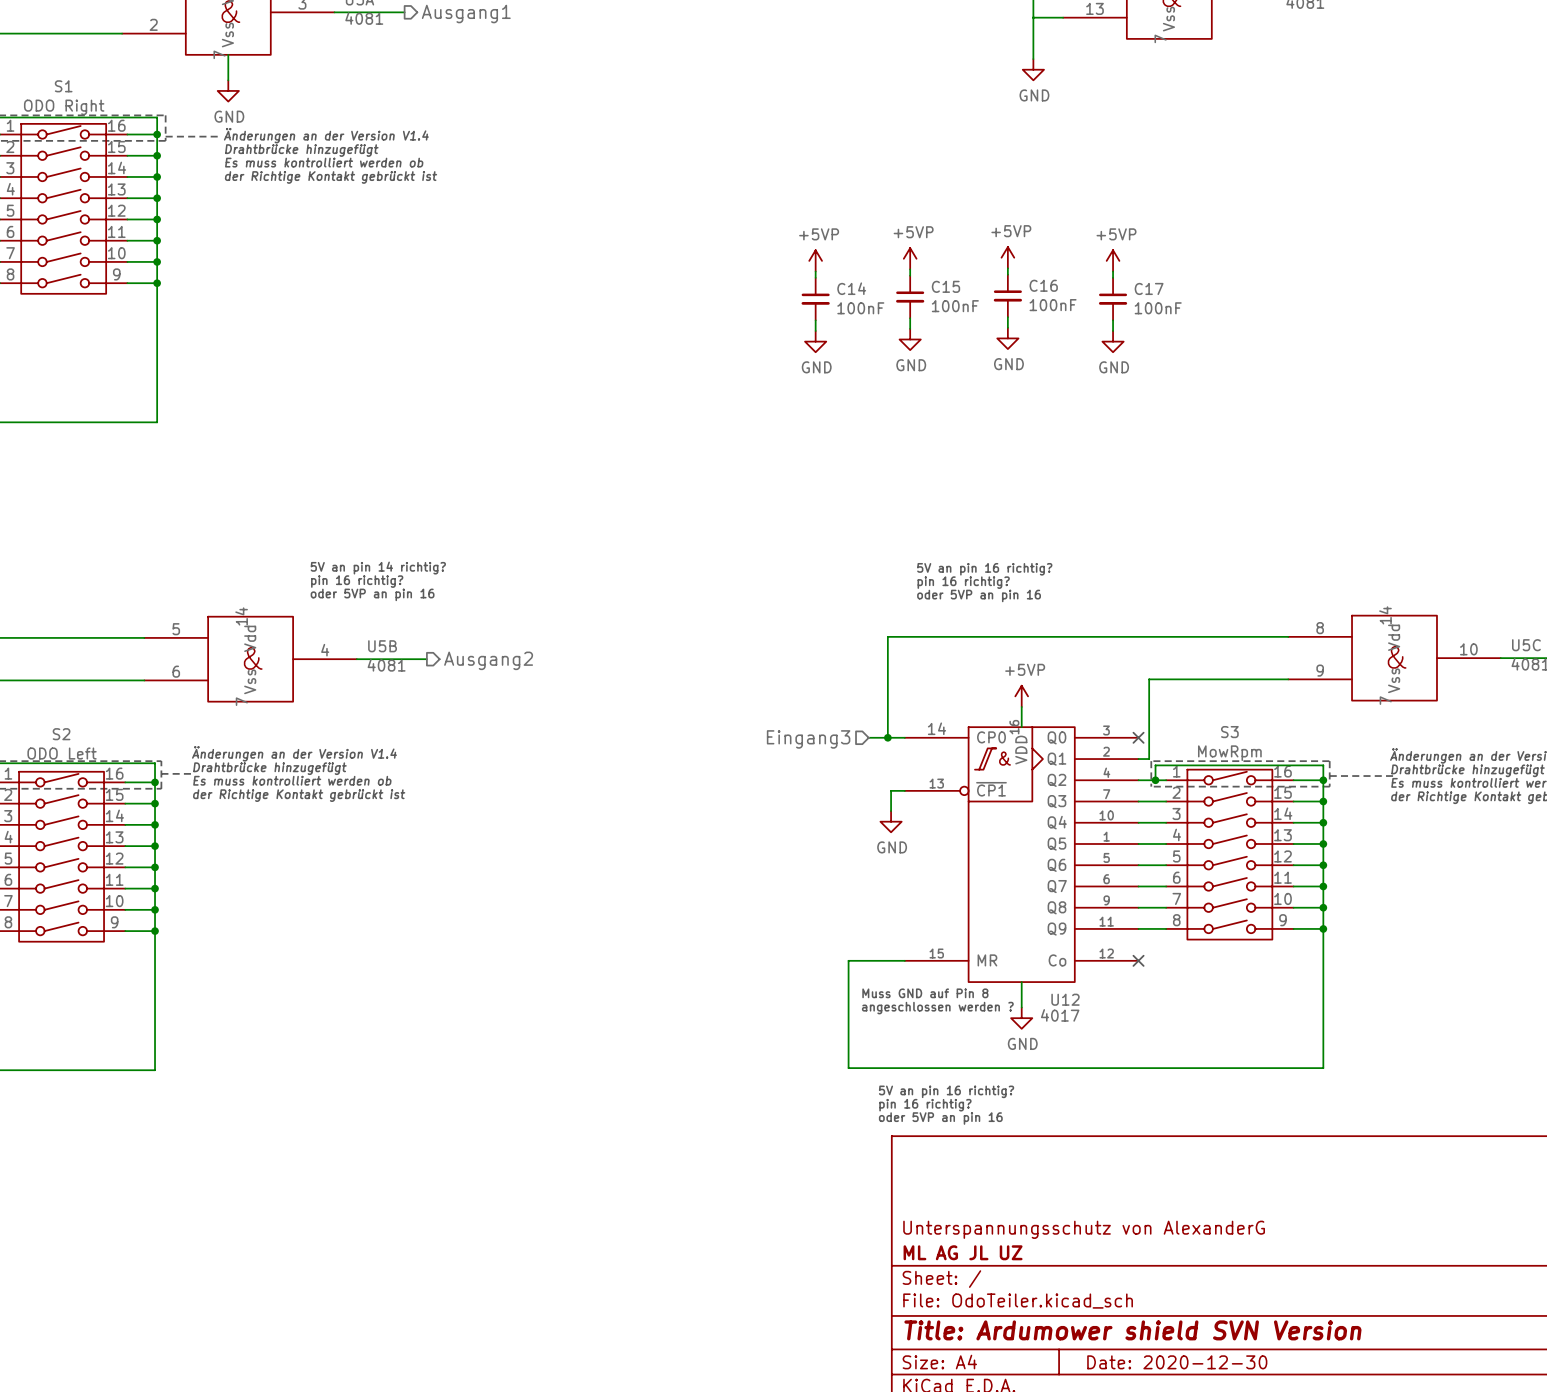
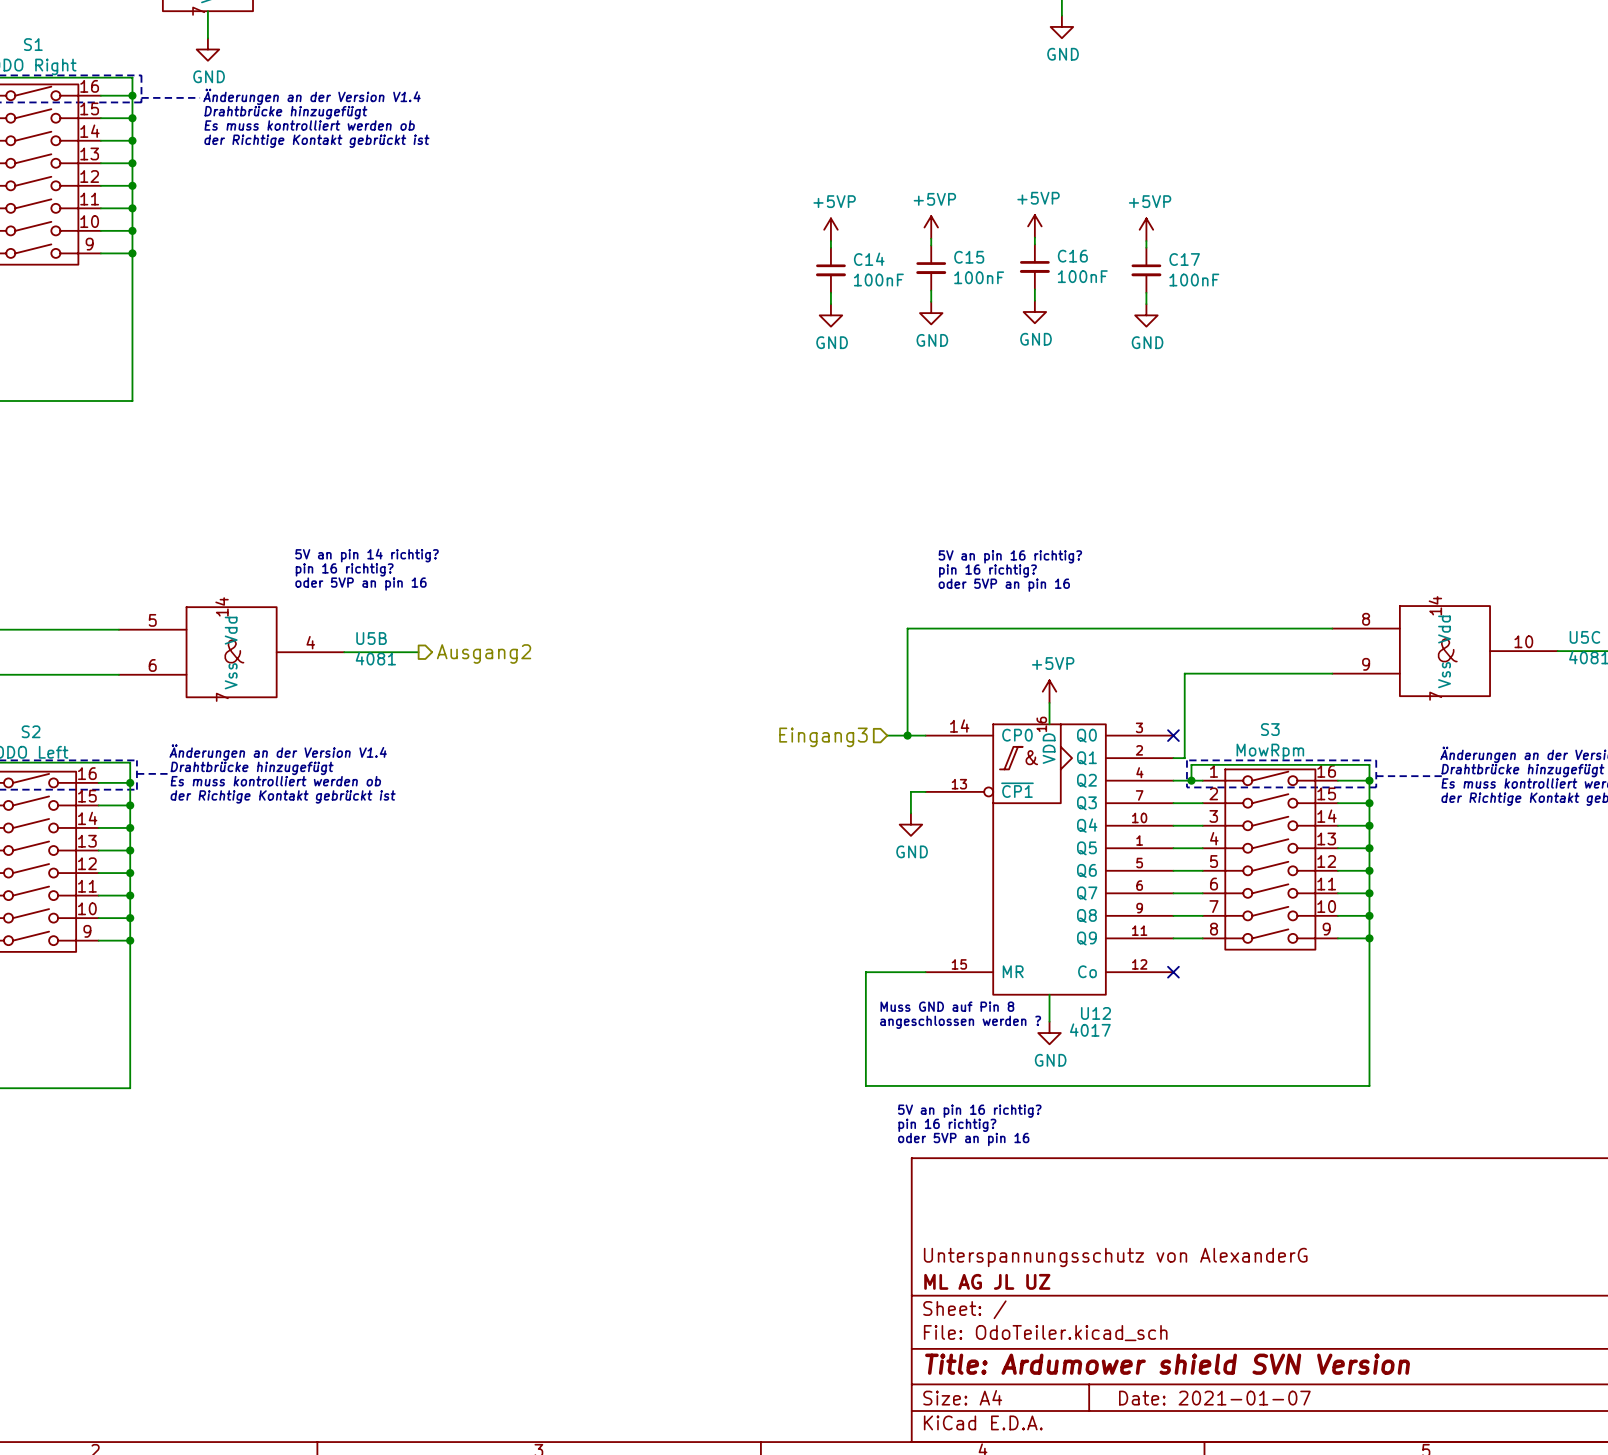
title block: Date: 2020-12-30 (1177, 1362) -> Date: 2021-01-07 (1214, 1398)

